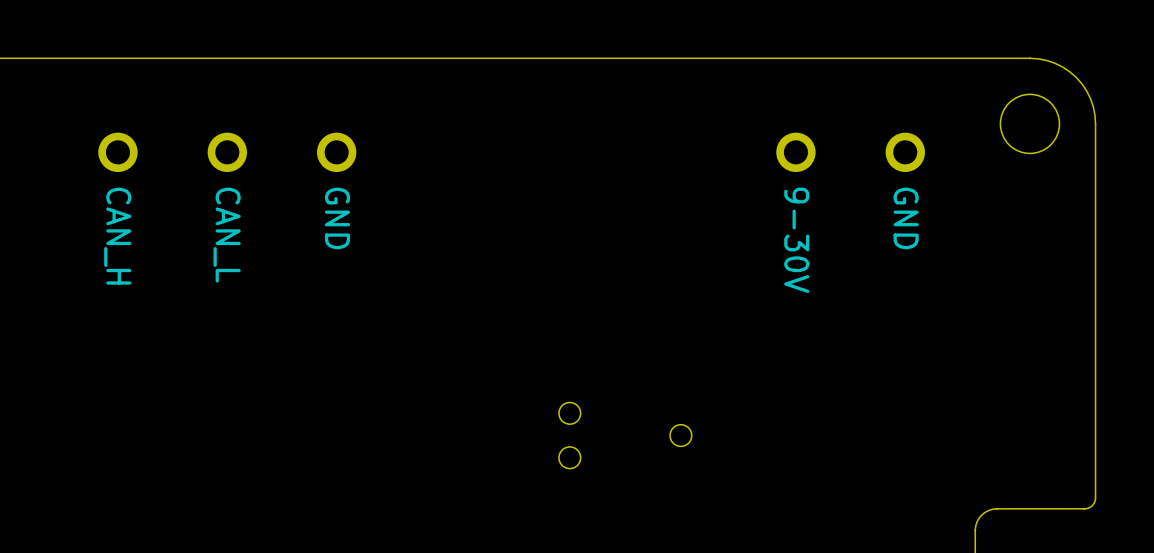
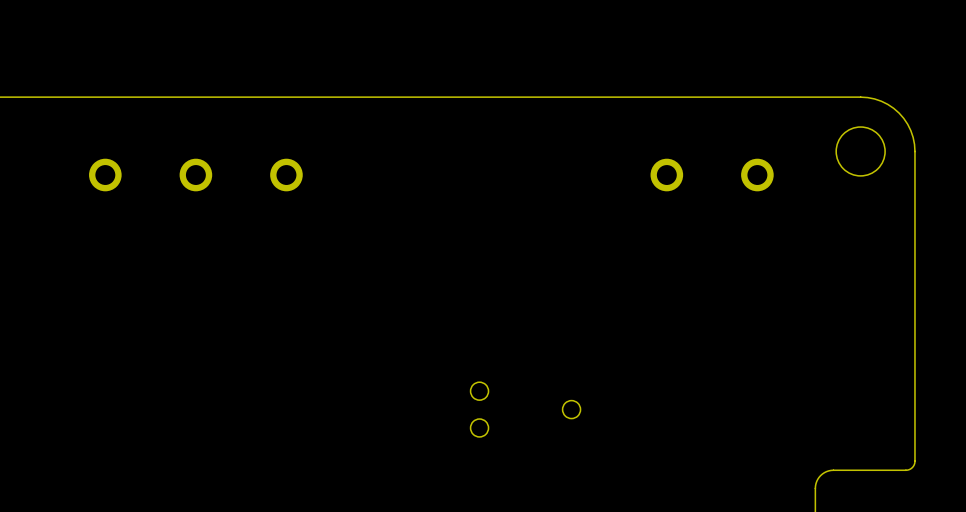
text: GND (337, 218) -> none
text: GND (906, 218) -> none
text: CAN_L (227, 235) -> none
text: CAN_H (117, 236) -> none
text: 9-30V (796, 240) -> none

